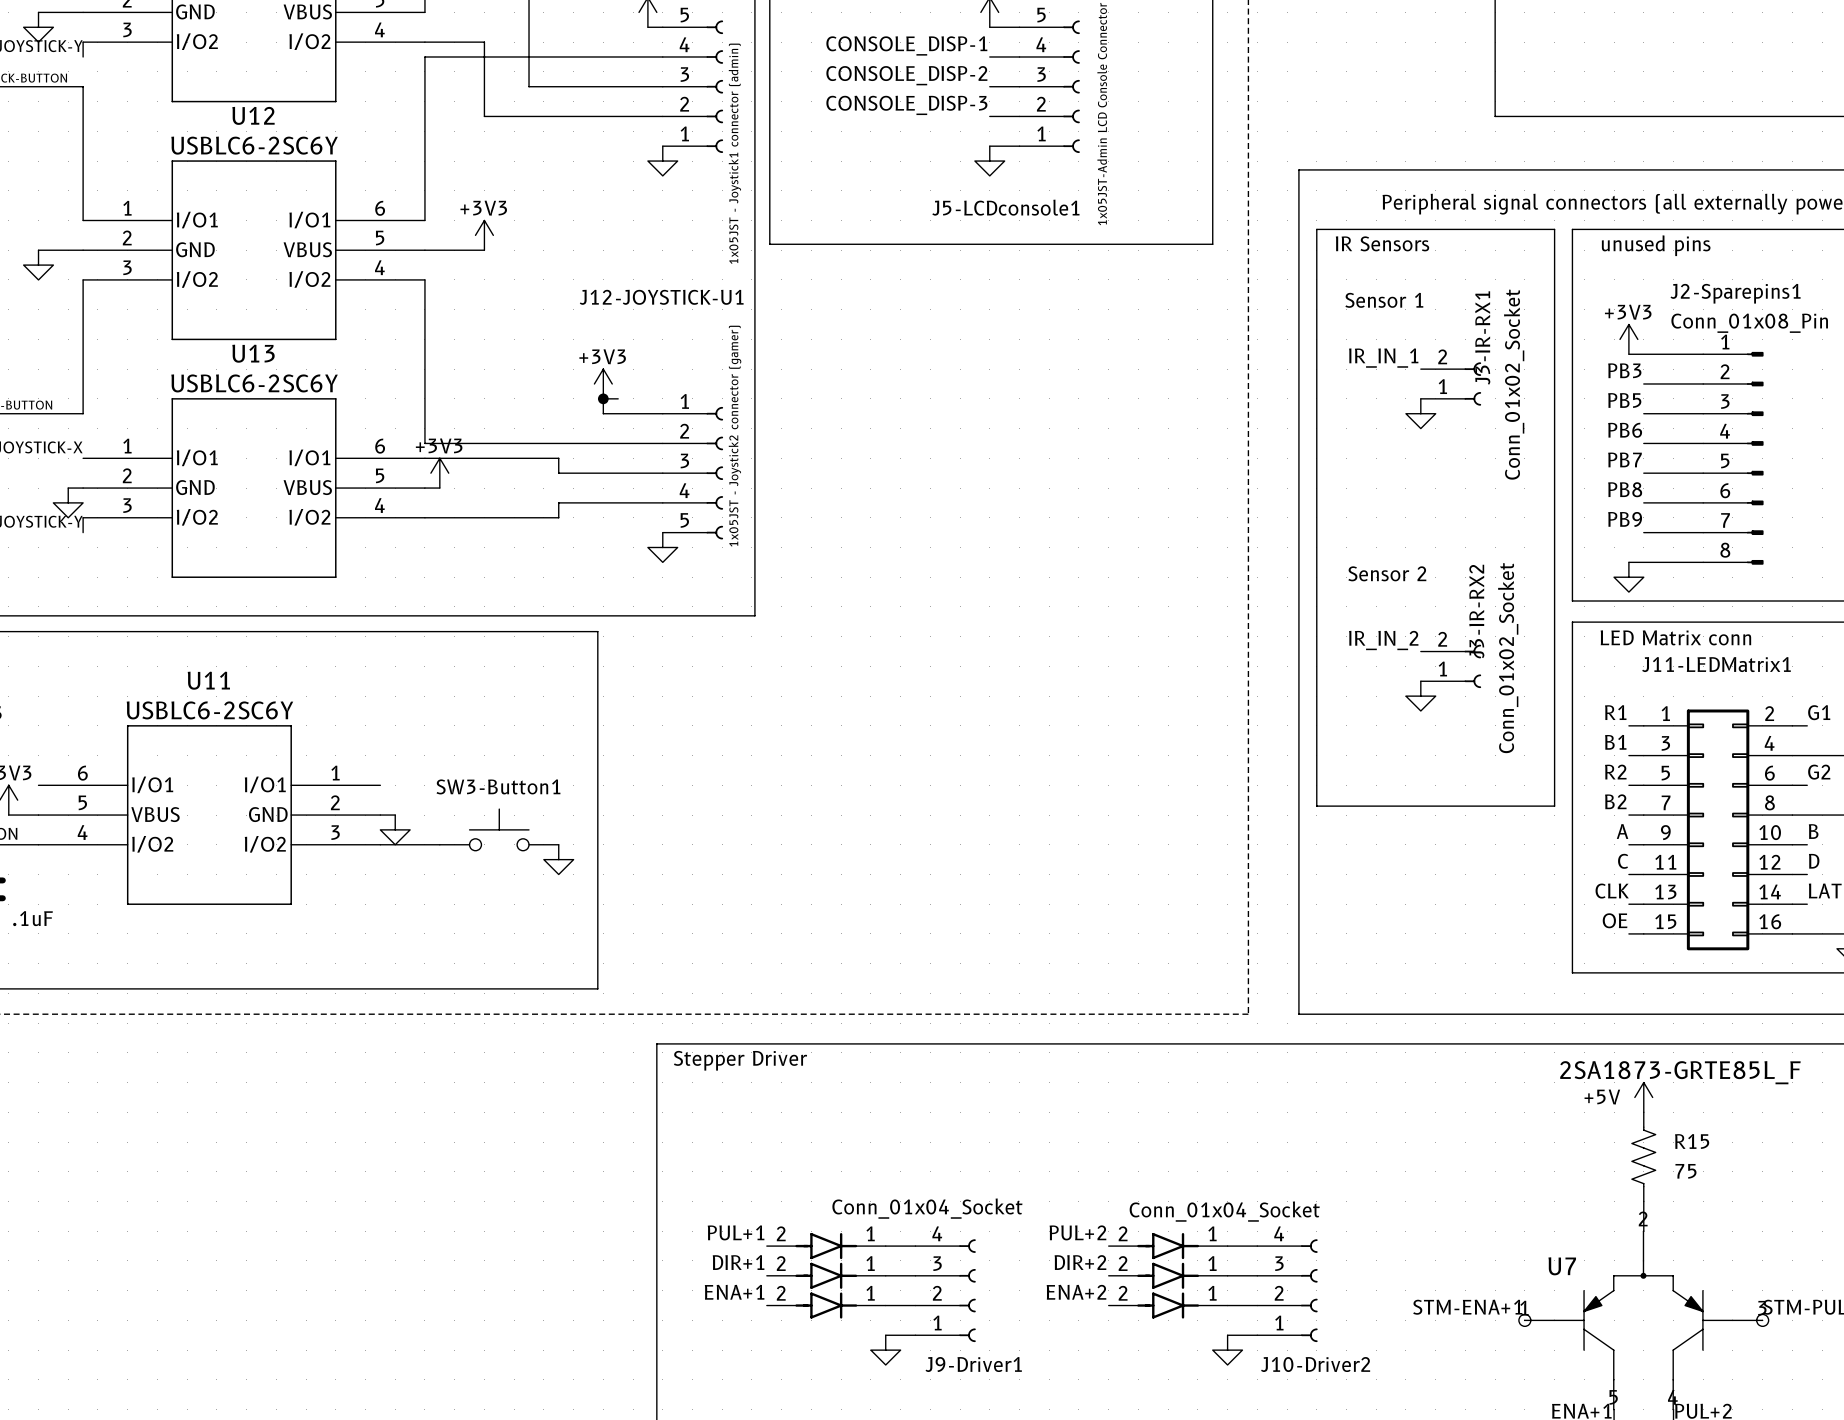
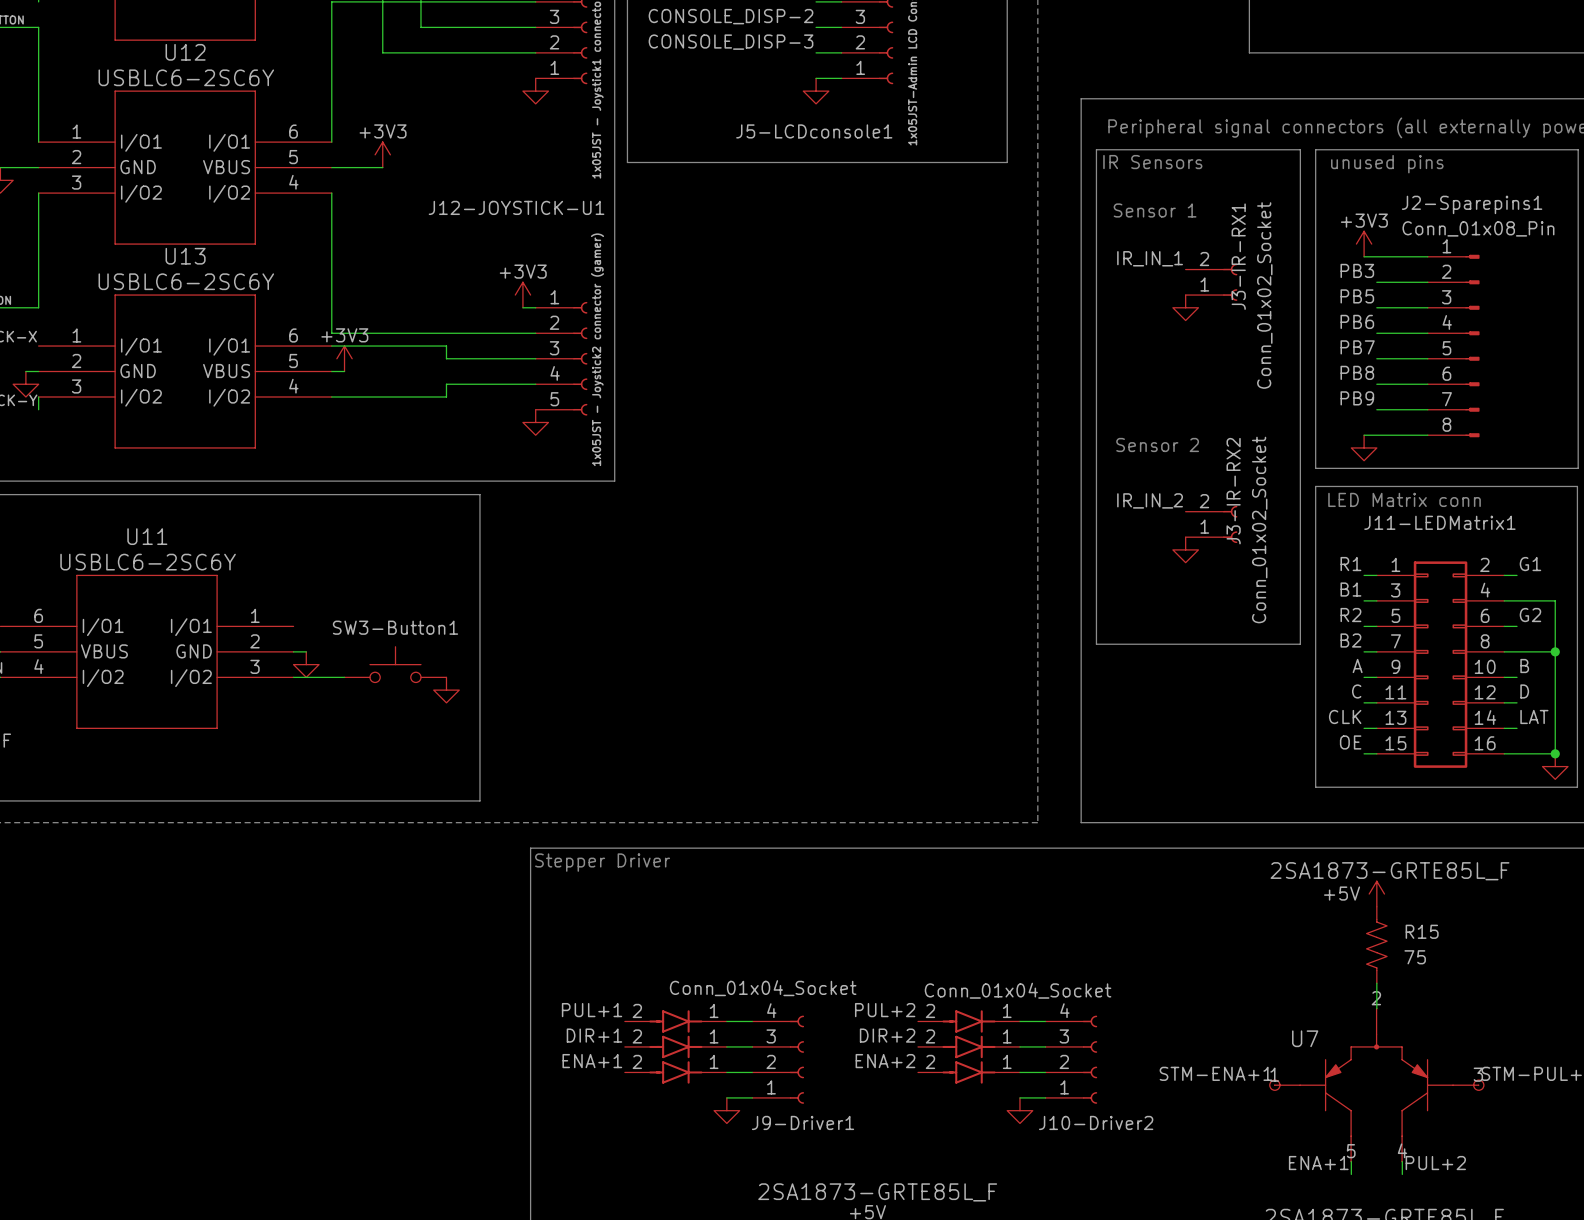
power symbol position: +3V3 (603, 383) -> +3V3 (522, 295)
junction: (603, 398) -> none
wire: (618, 398) (603, 398) (603, 413) (647, 413) -> none

